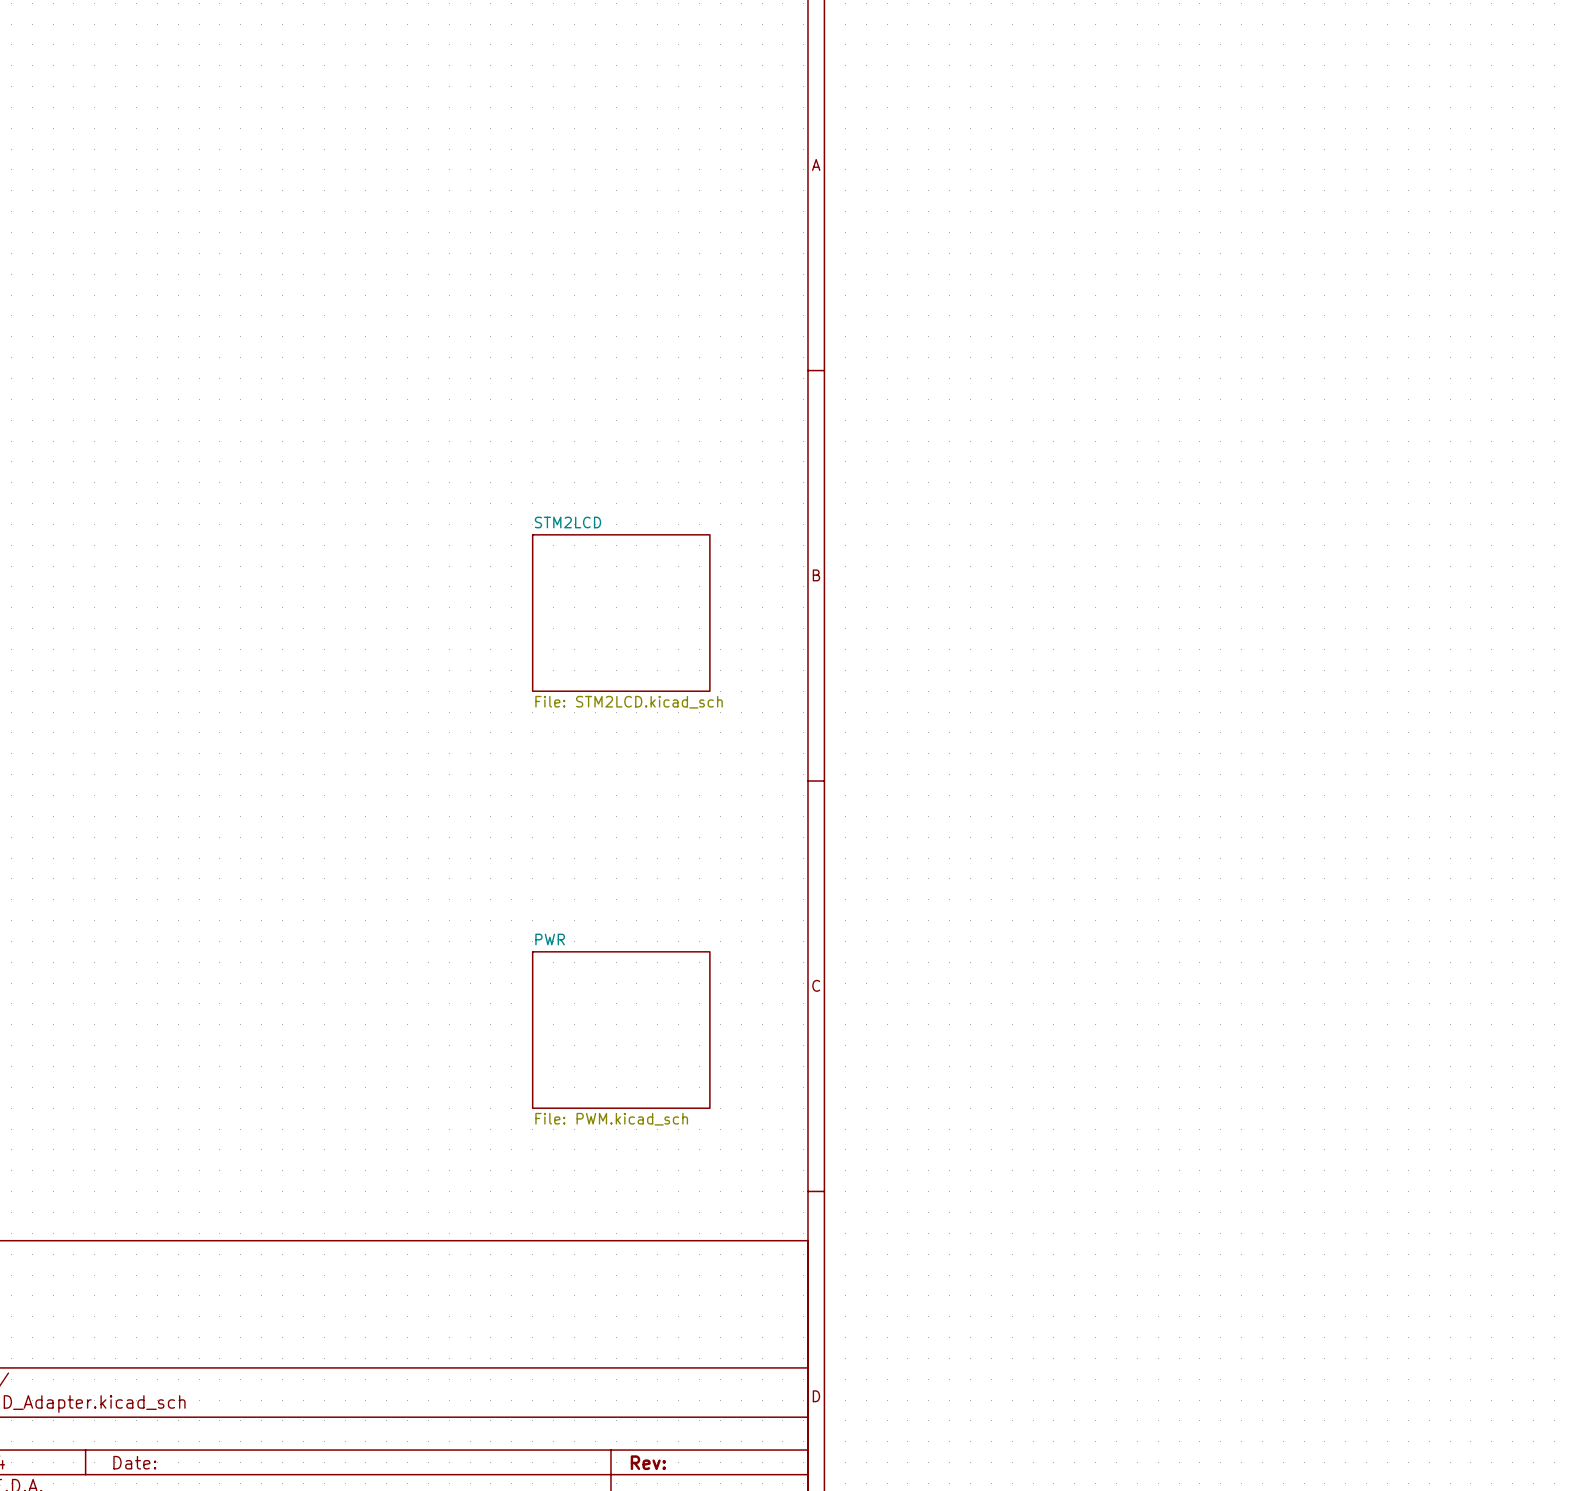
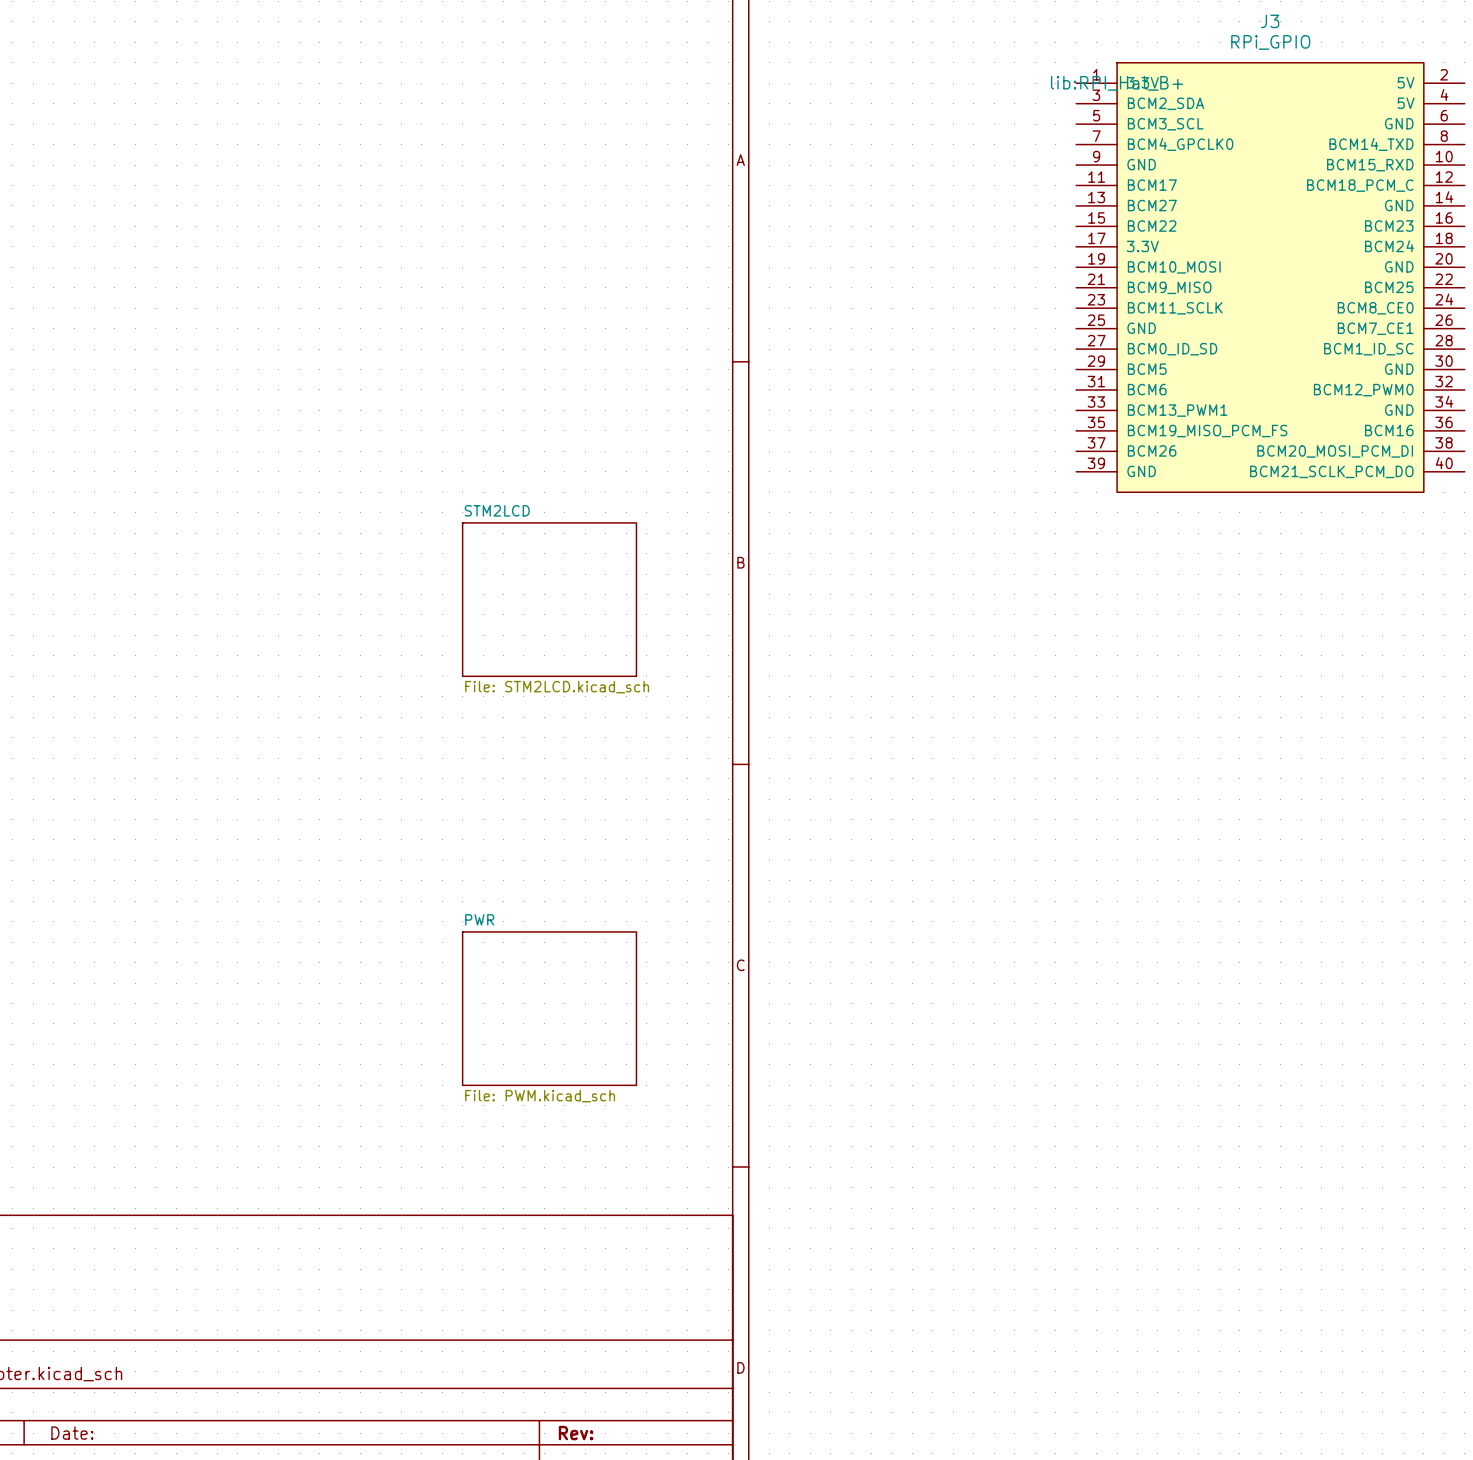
J3: none -> RPi_GPIO (1270, 277)

